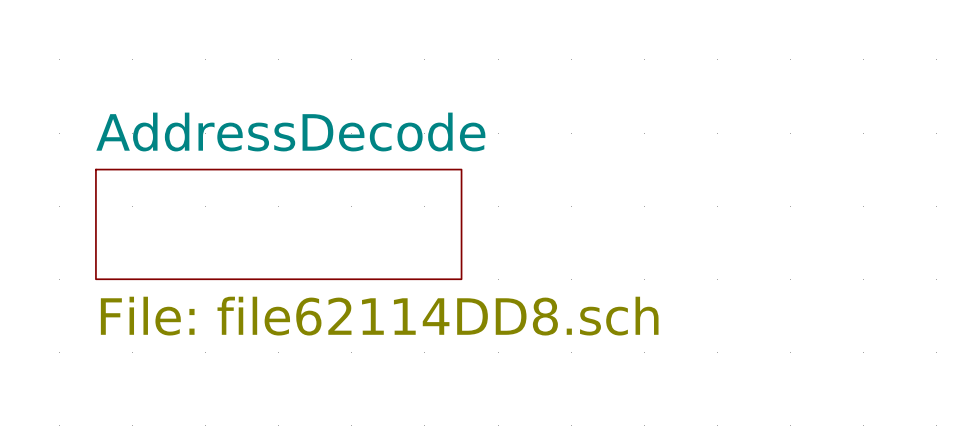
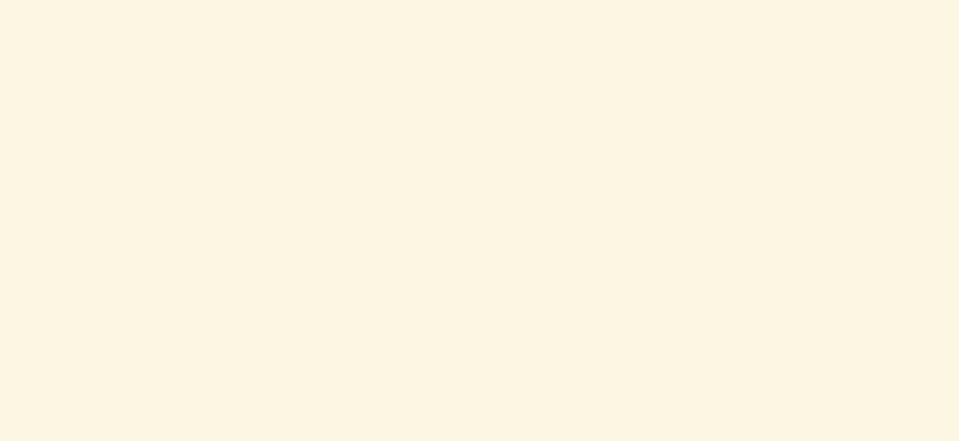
sheet AddressDecode: File: file62114DD8.sch (278, 224) -> none

